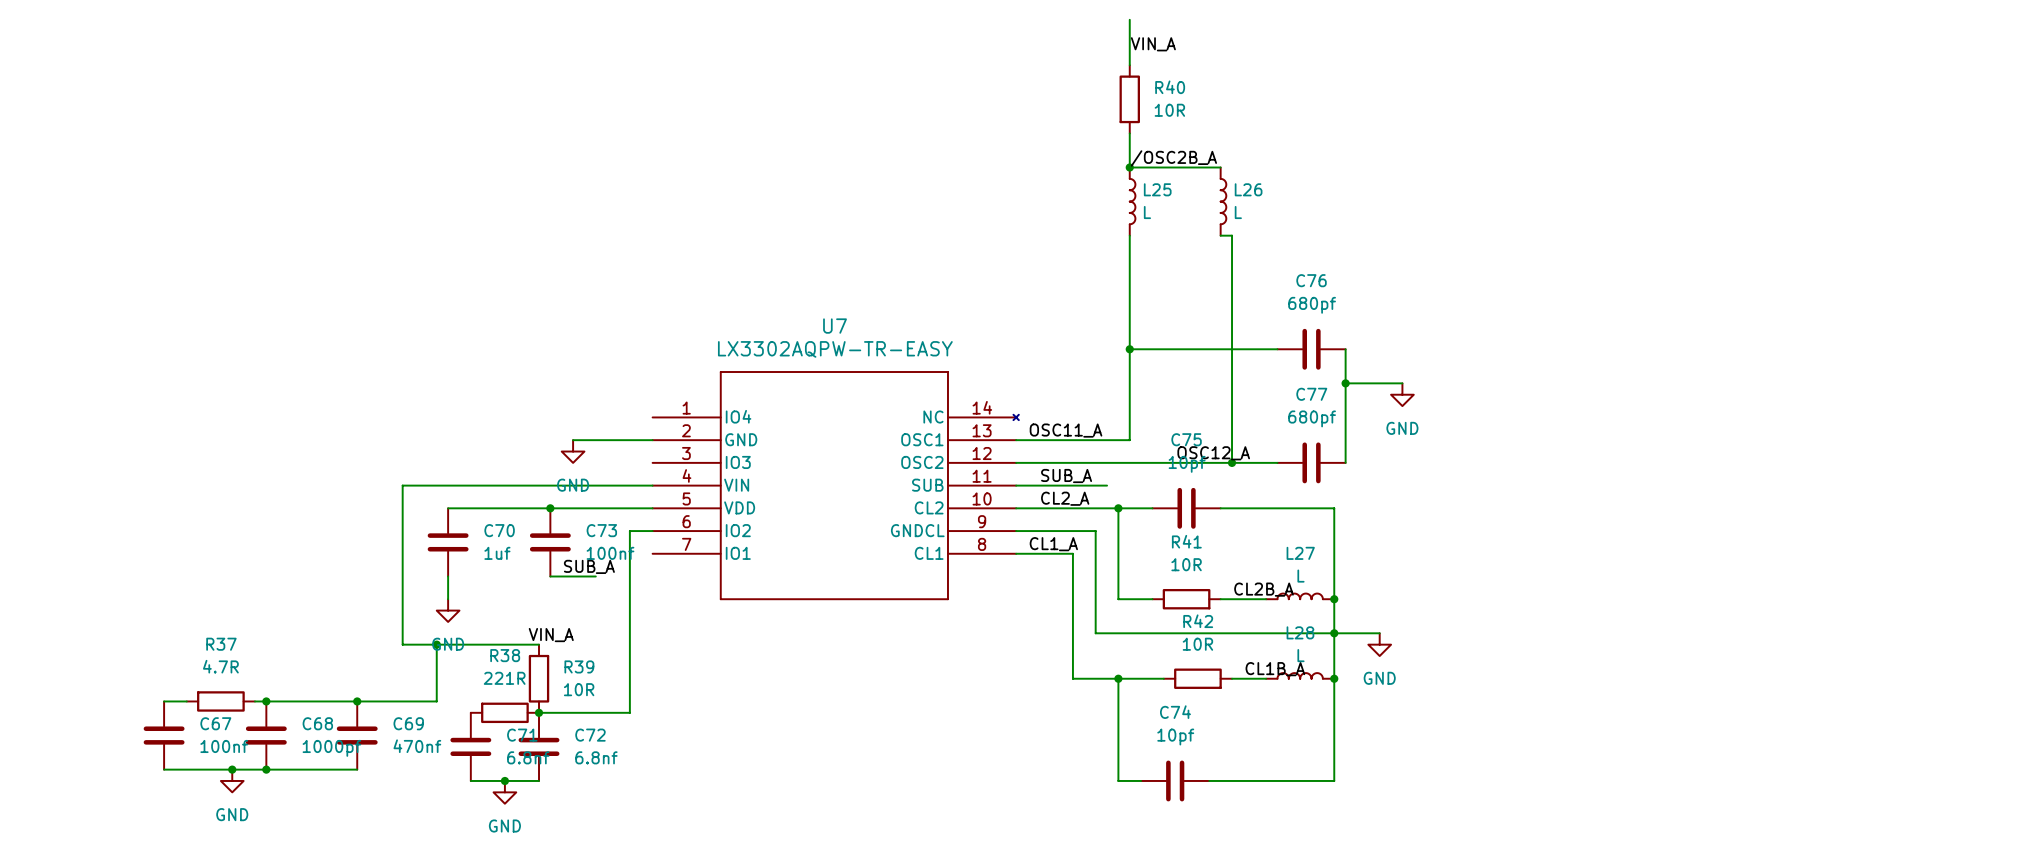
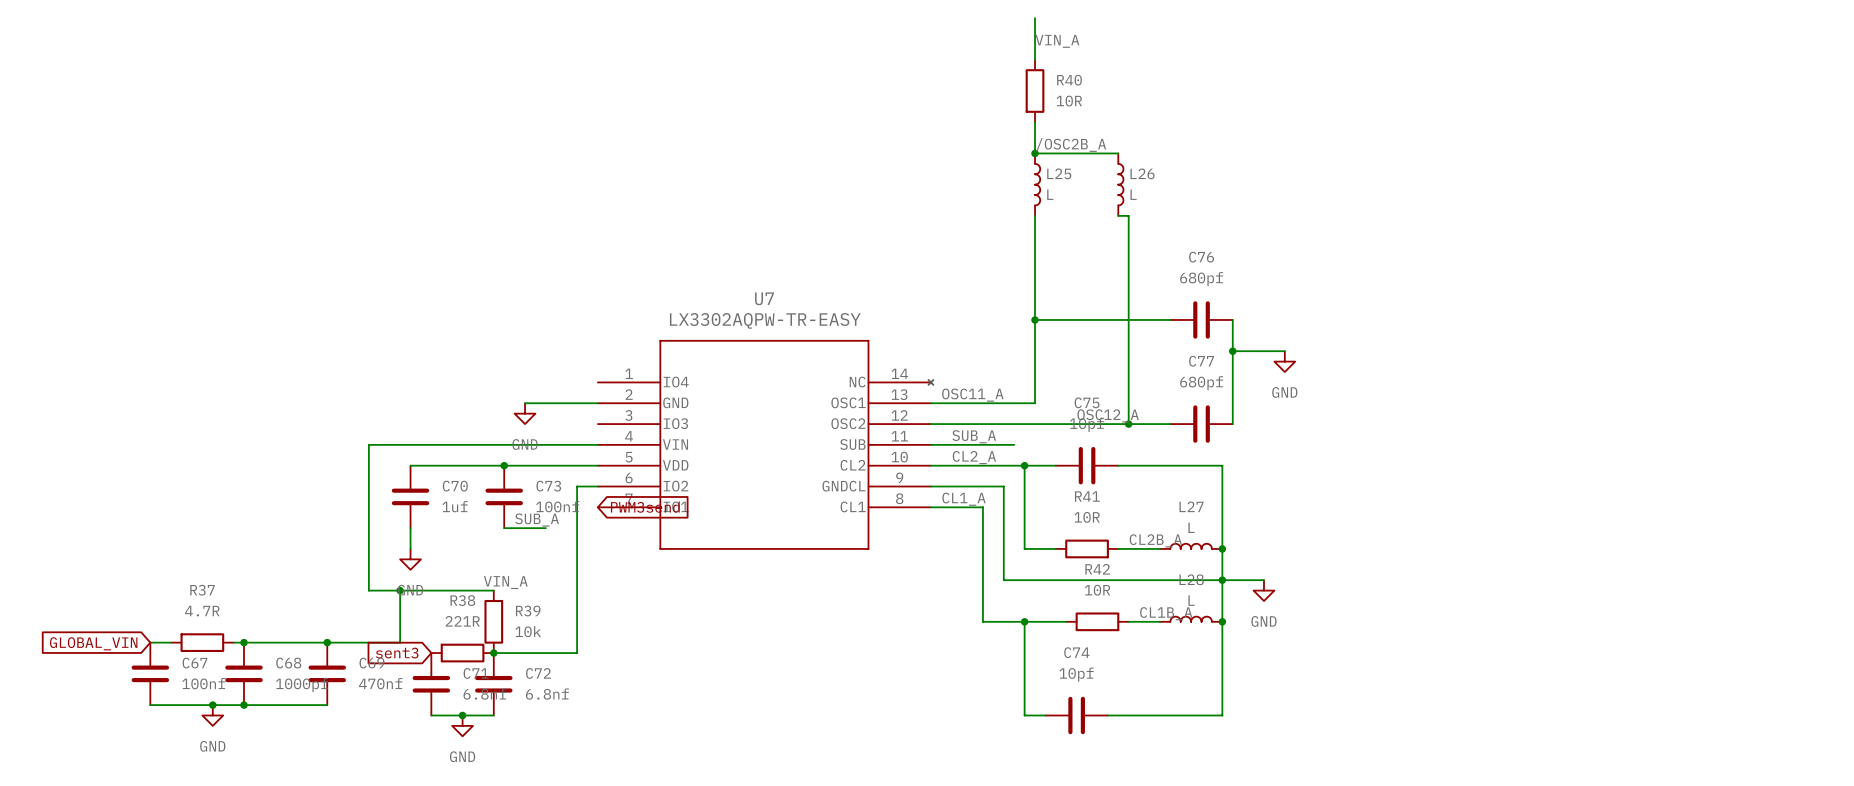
global label: none -> PWM3send (645, 507)
R39 value: 10R (579, 689) -> 10k (528, 631)
global label: none -> GLOBAL_VIN (93, 643)
global label: none -> sent3 (397, 653)

